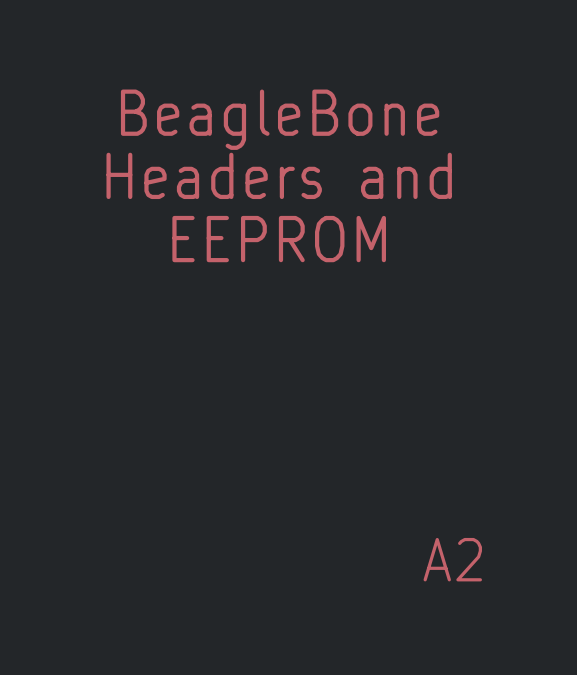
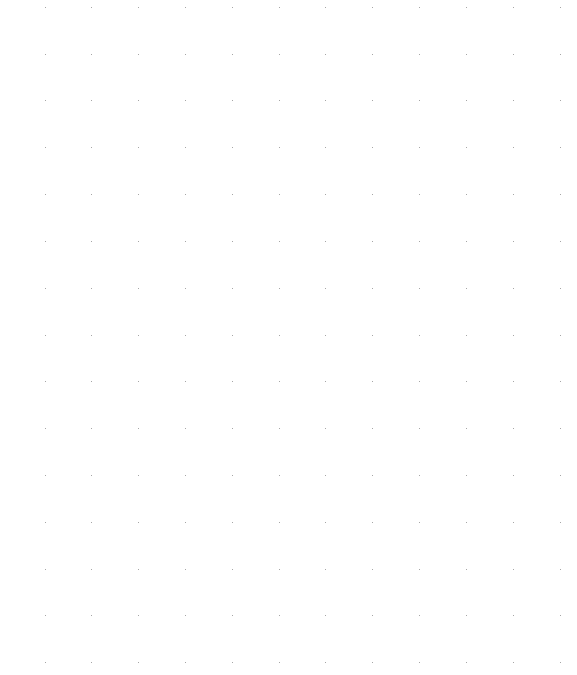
text: BeagleBone (280, 119) -> none
text: Headers and (279, 175) -> none
text: EEPROM (279, 239) -> none
text: A2 (452, 559) -> none

